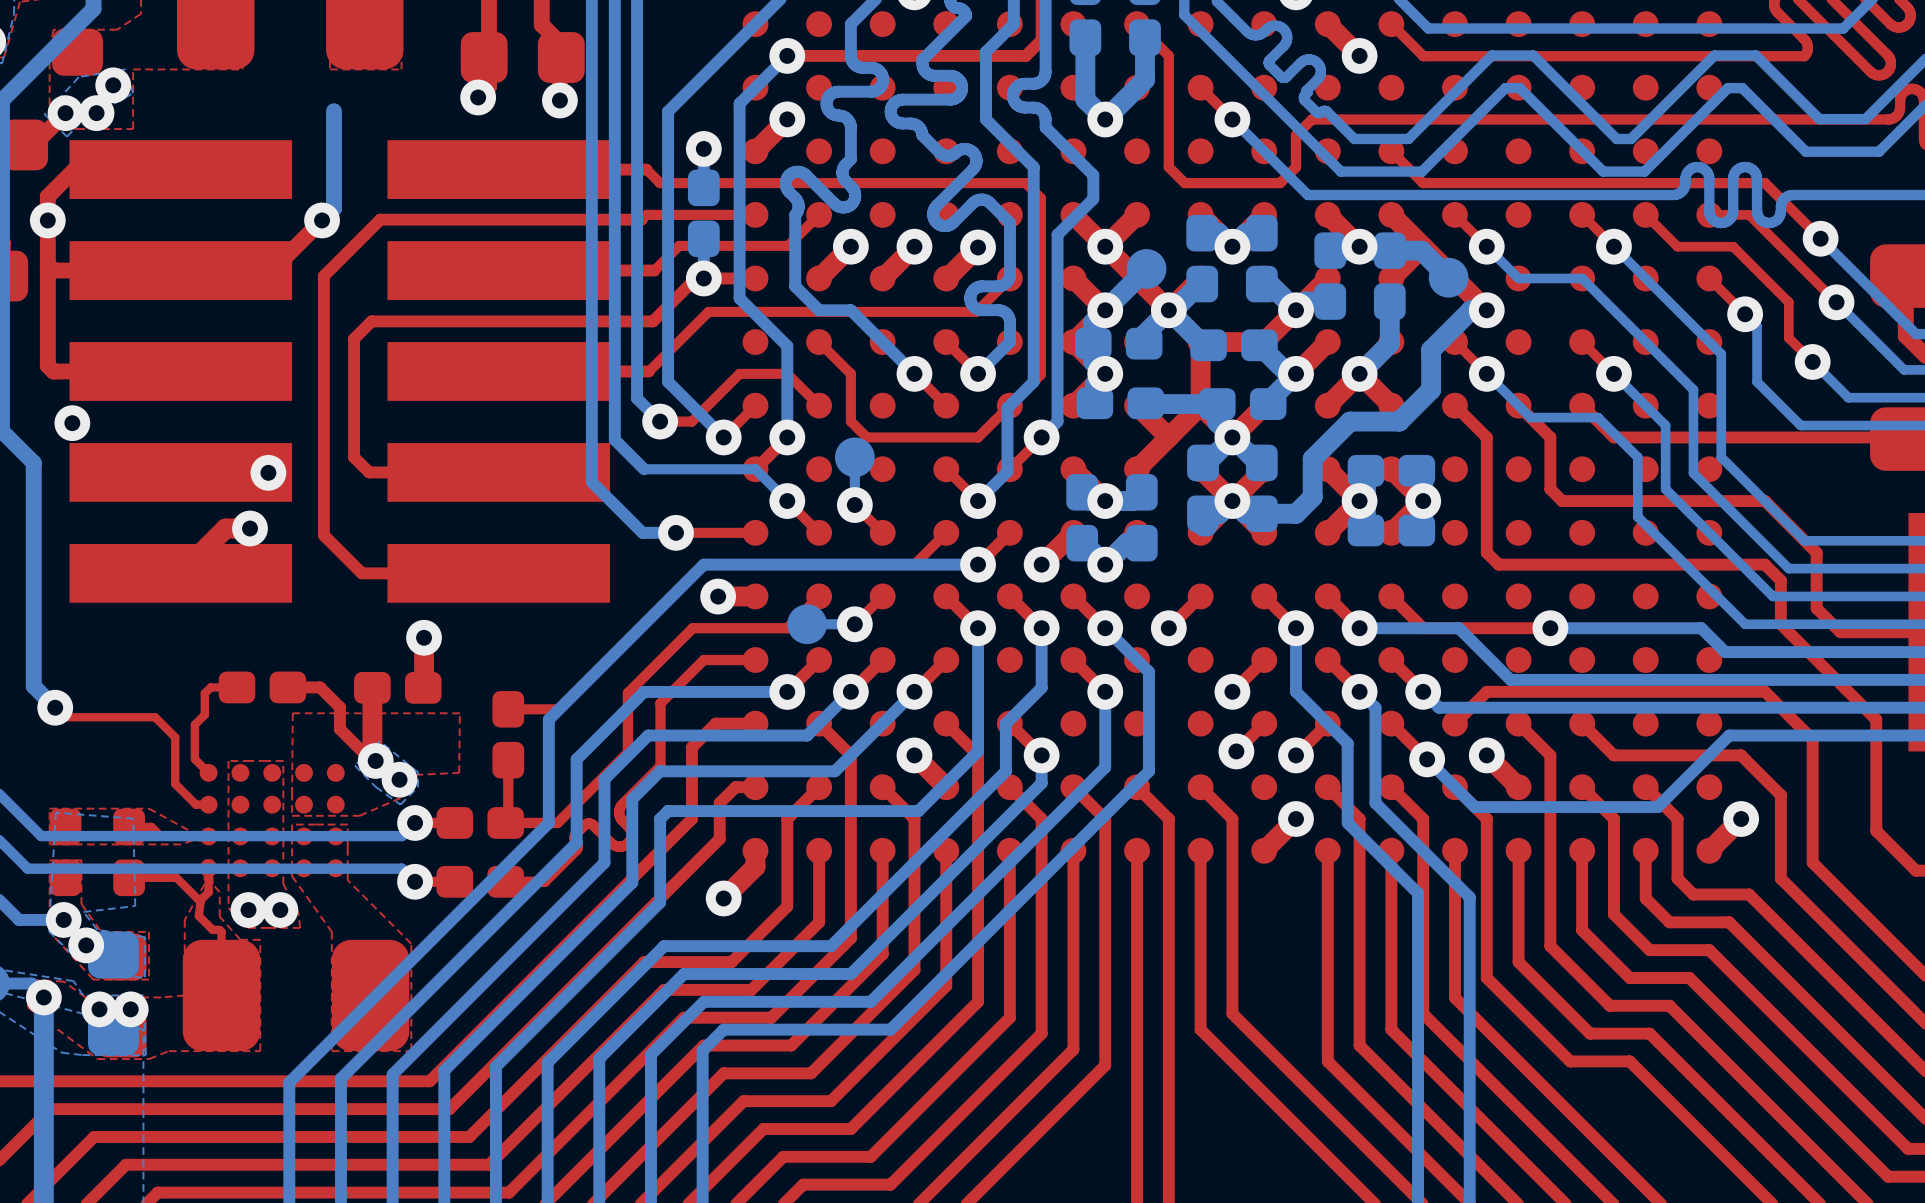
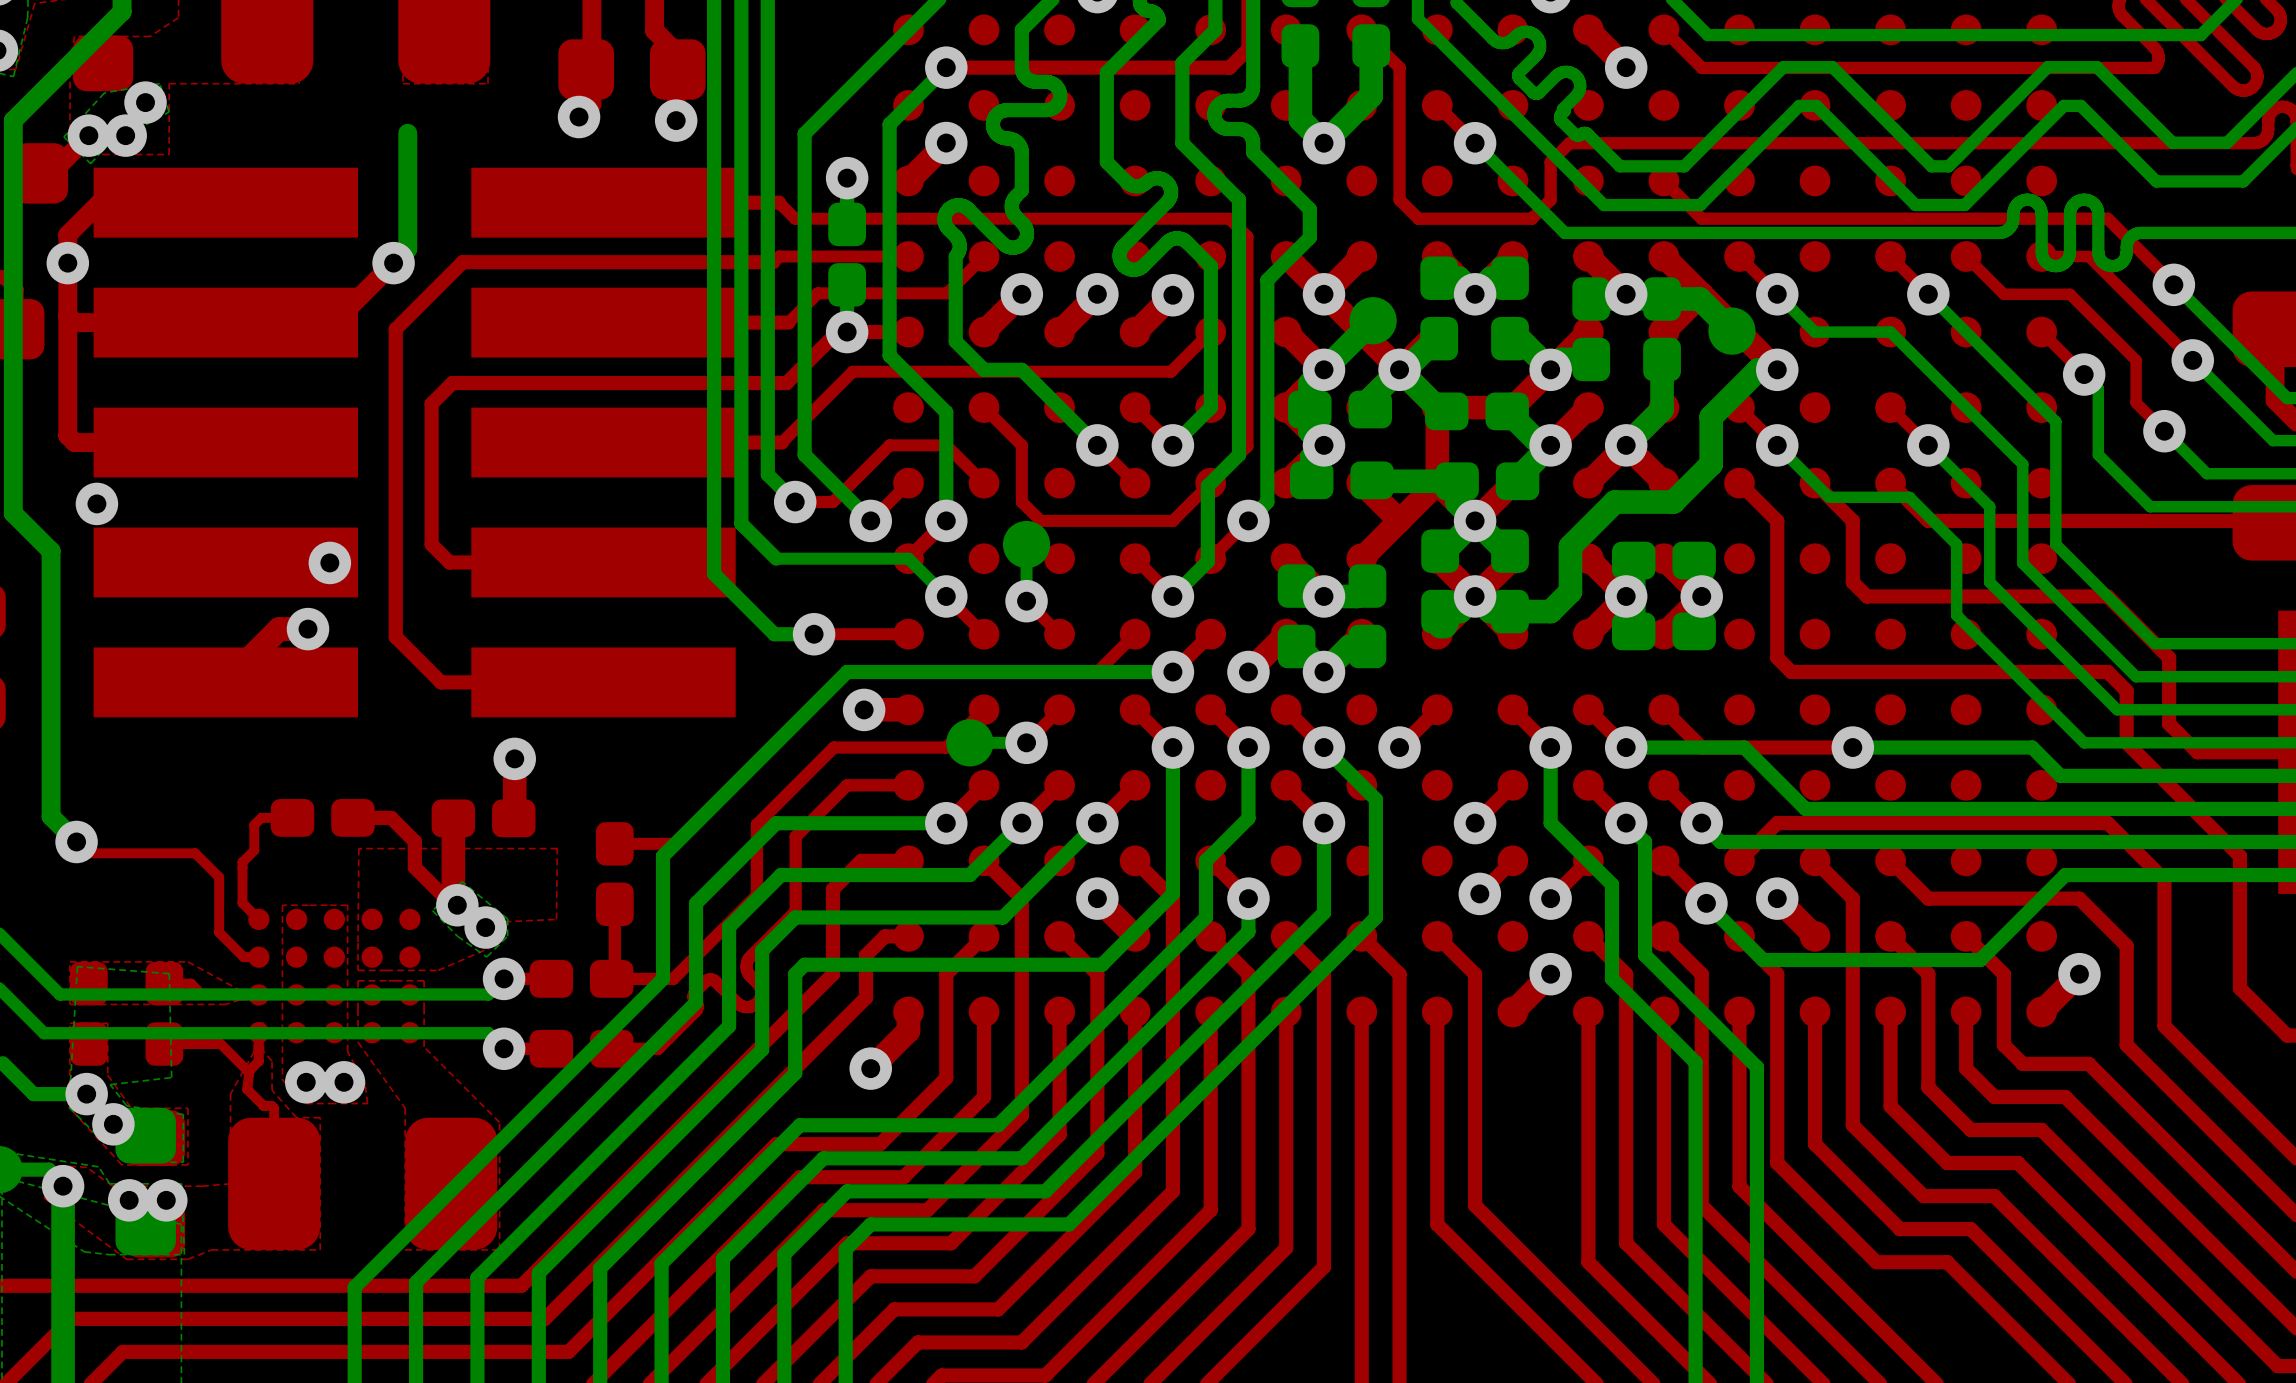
bottom track: (922, 63) (923, 69) (929, 74) (955, 76) (960, 82) (962, 87) (959, 95) (952, 99) (902, 99) (893, 104) (890, 111) (893, 119) (899, 123) (915, 124) (921, 130) (922, 135) -> (1106, 77) (1106, 162)
bottom track: (1009, 274) (1008, 279) (1003, 285) (976, 287) (971, 293) (970, 298) (971, 303) (976, 308) (1003, 311) (1008, 316) (1009, 322) -> (1210, 327) (1210, 383)

